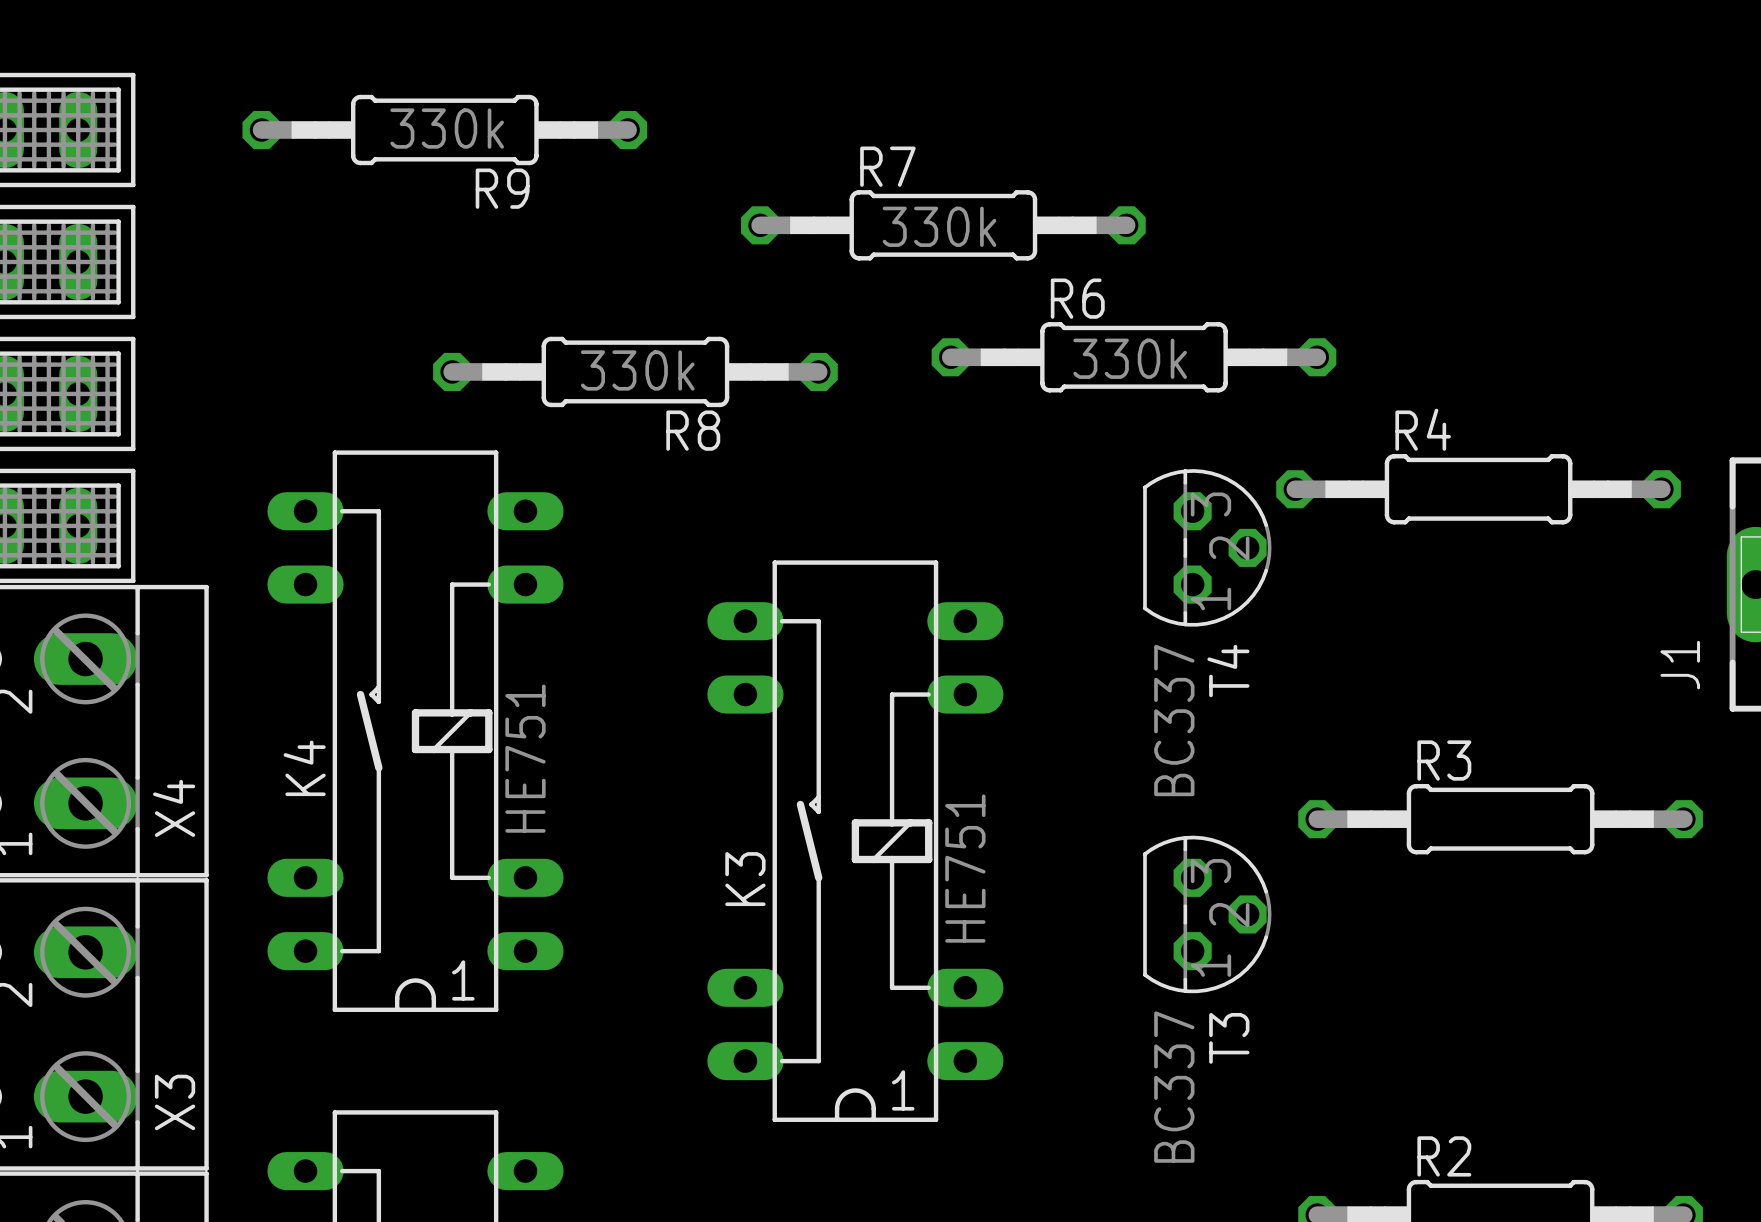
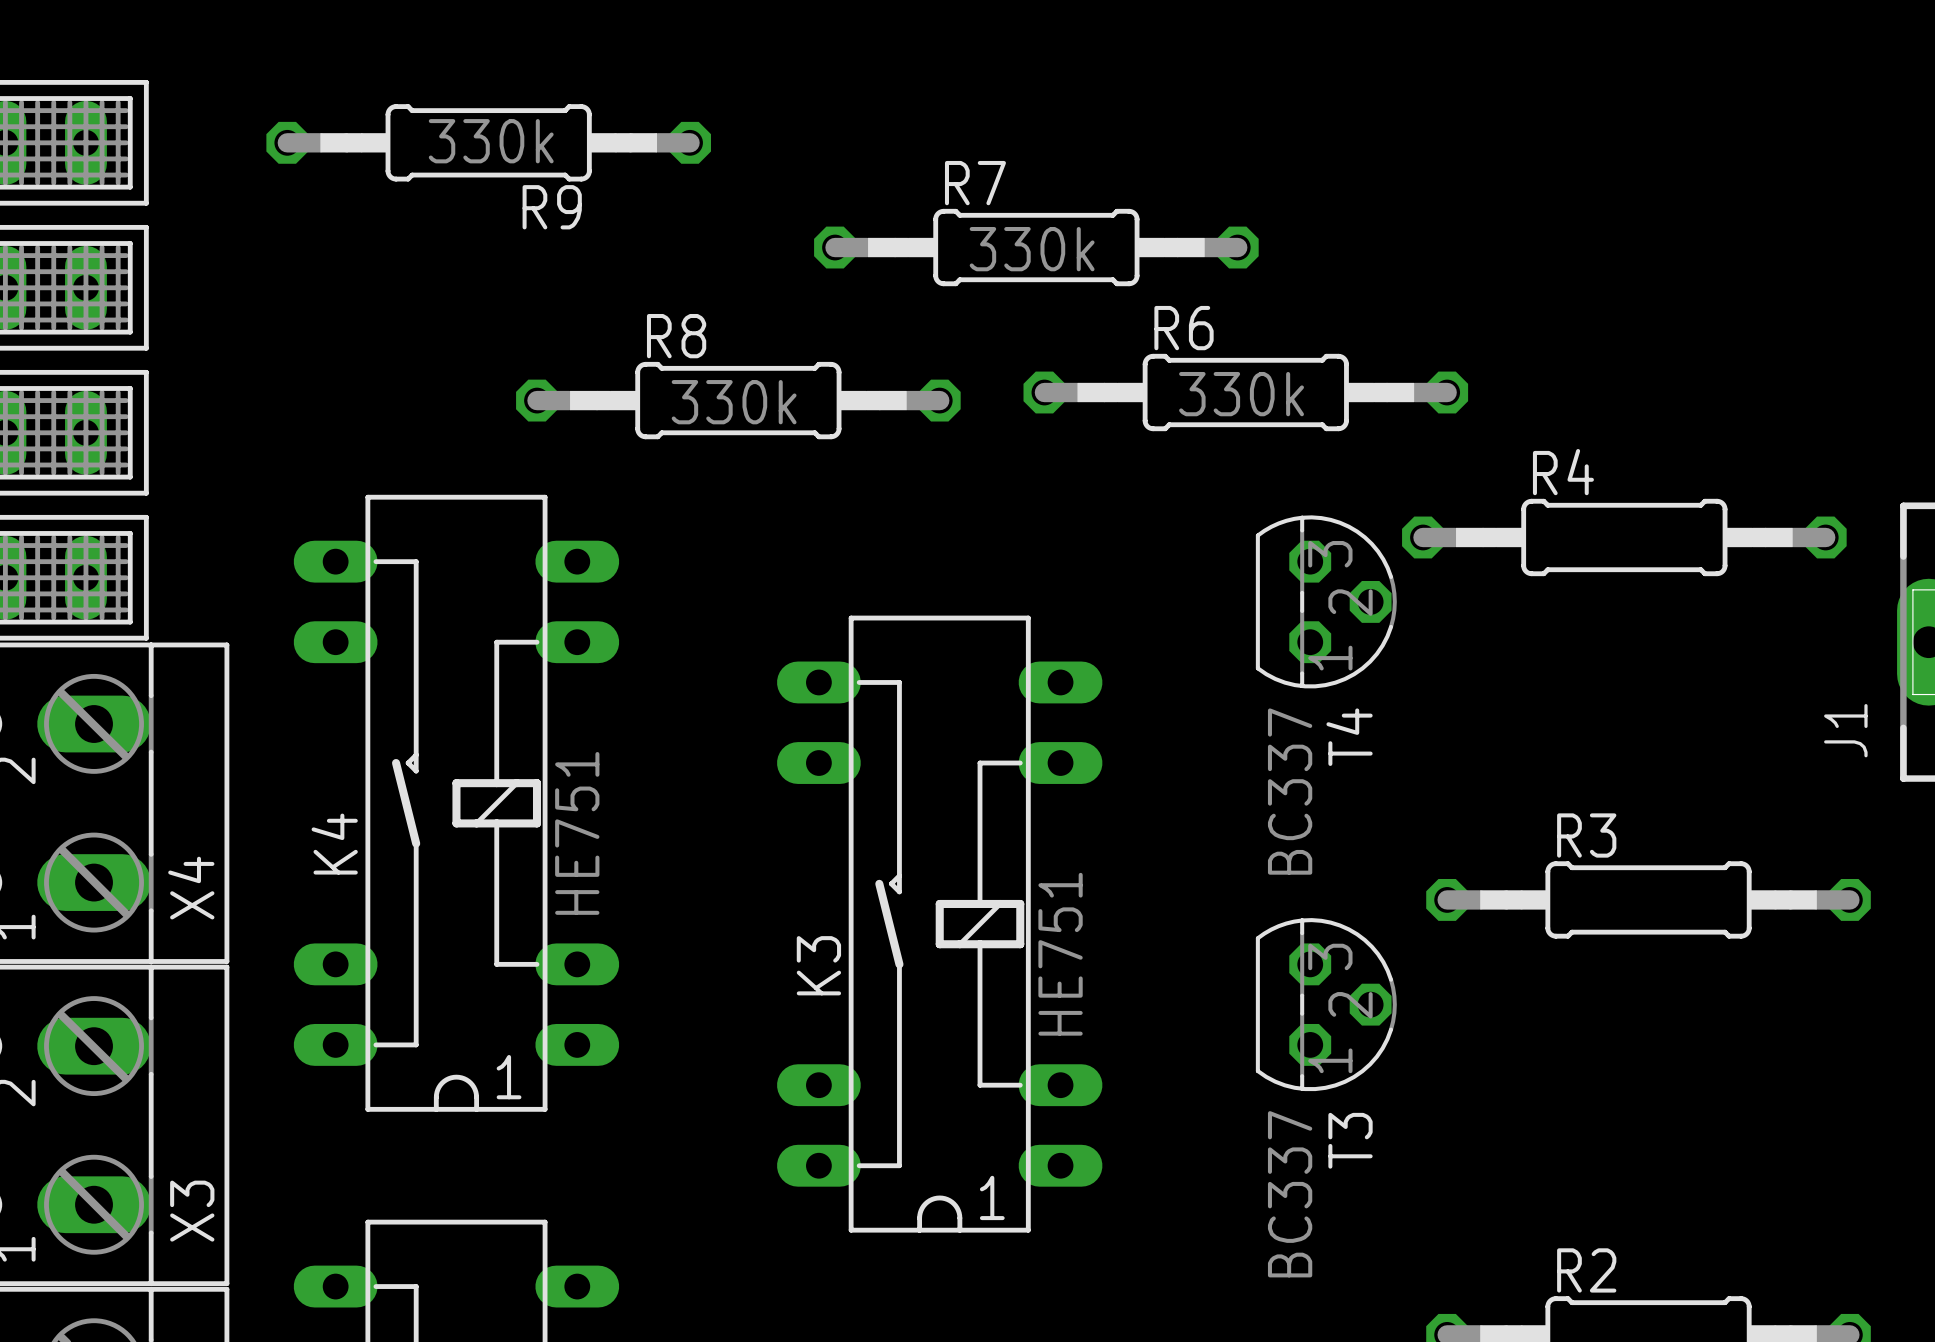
R8 value position: 330k (637, 370) -> 330k (734, 402)
R8 position: (635, 371) -> (738, 400)
R8 name position: R8 (693, 430) -> R8 (676, 336)

